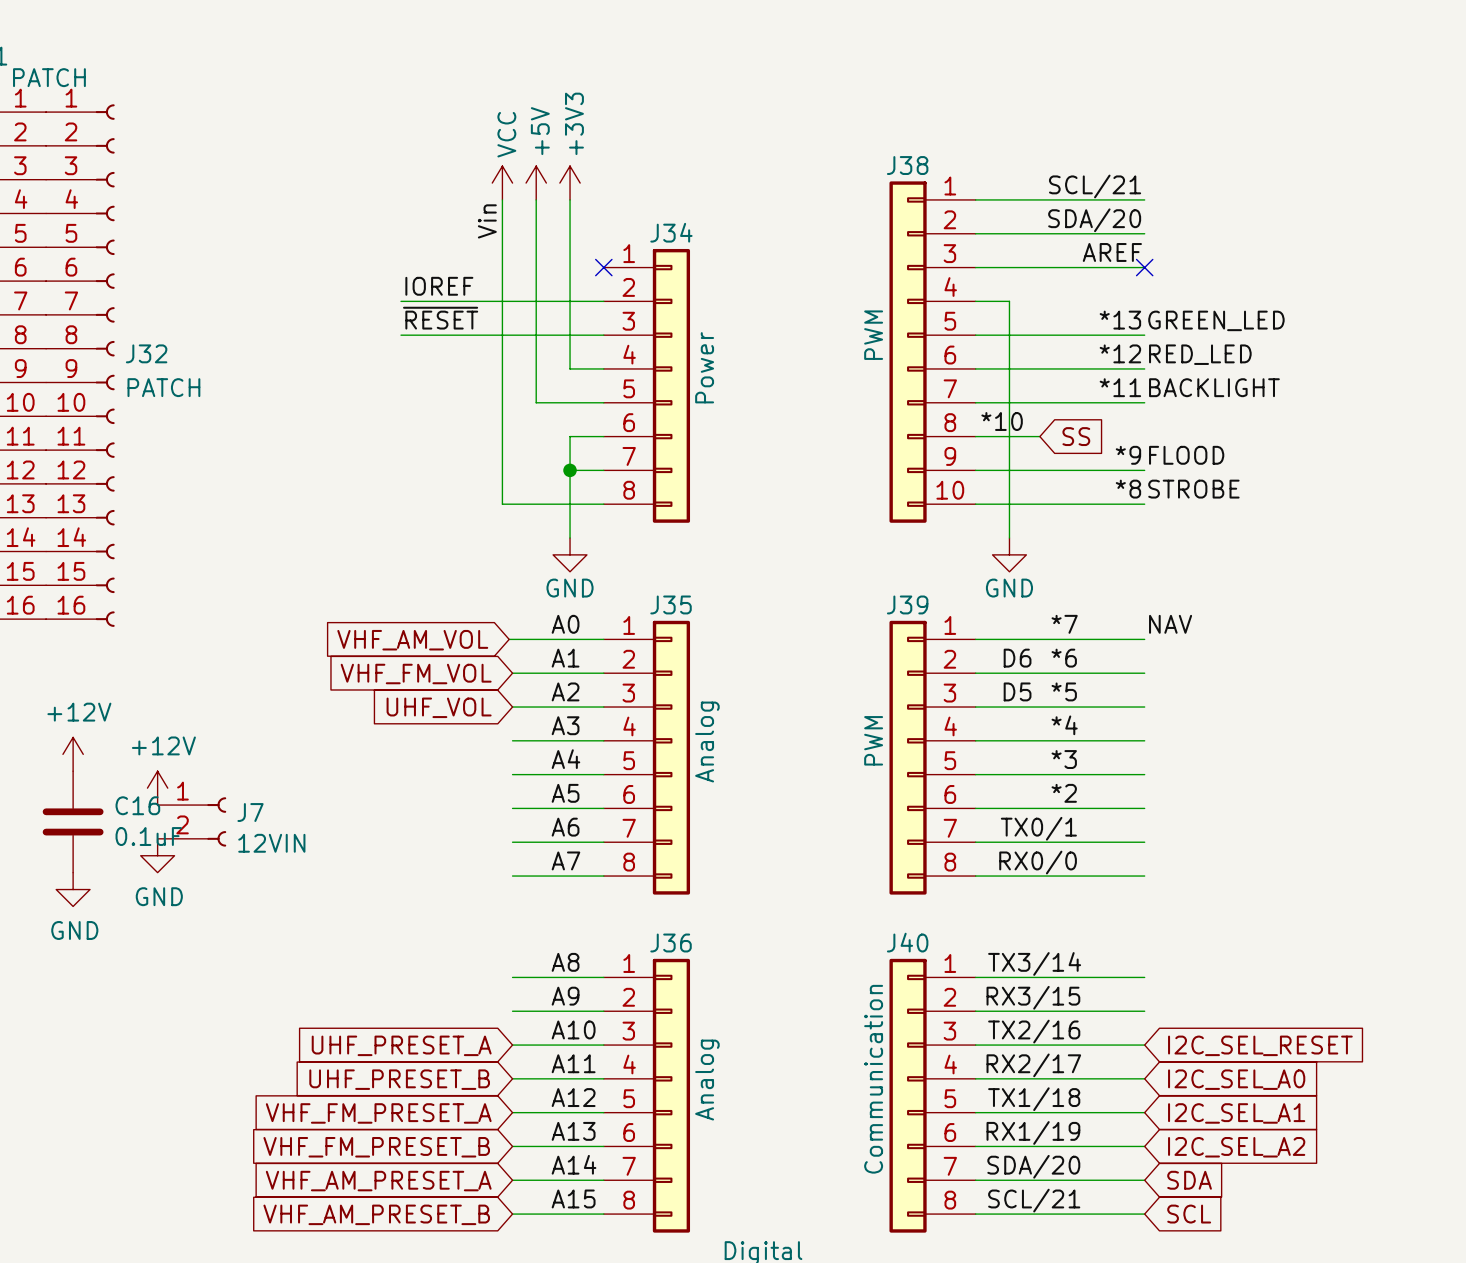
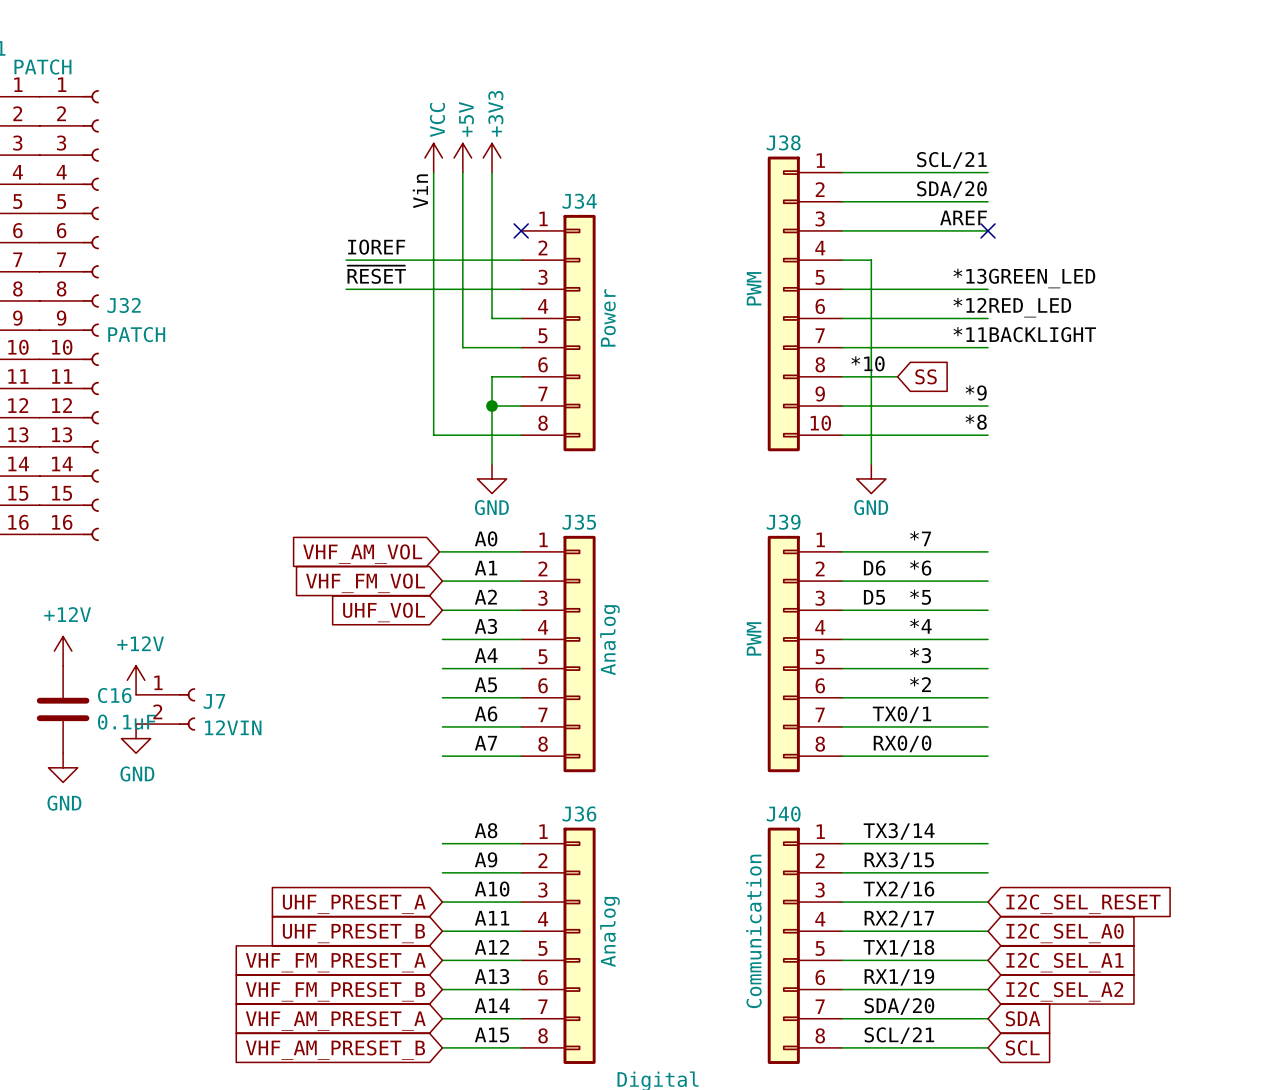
label: FLOOD (1186, 455) -> none
label: STROBE (1193, 489) -> none
label: NAV (1170, 624) -> none

